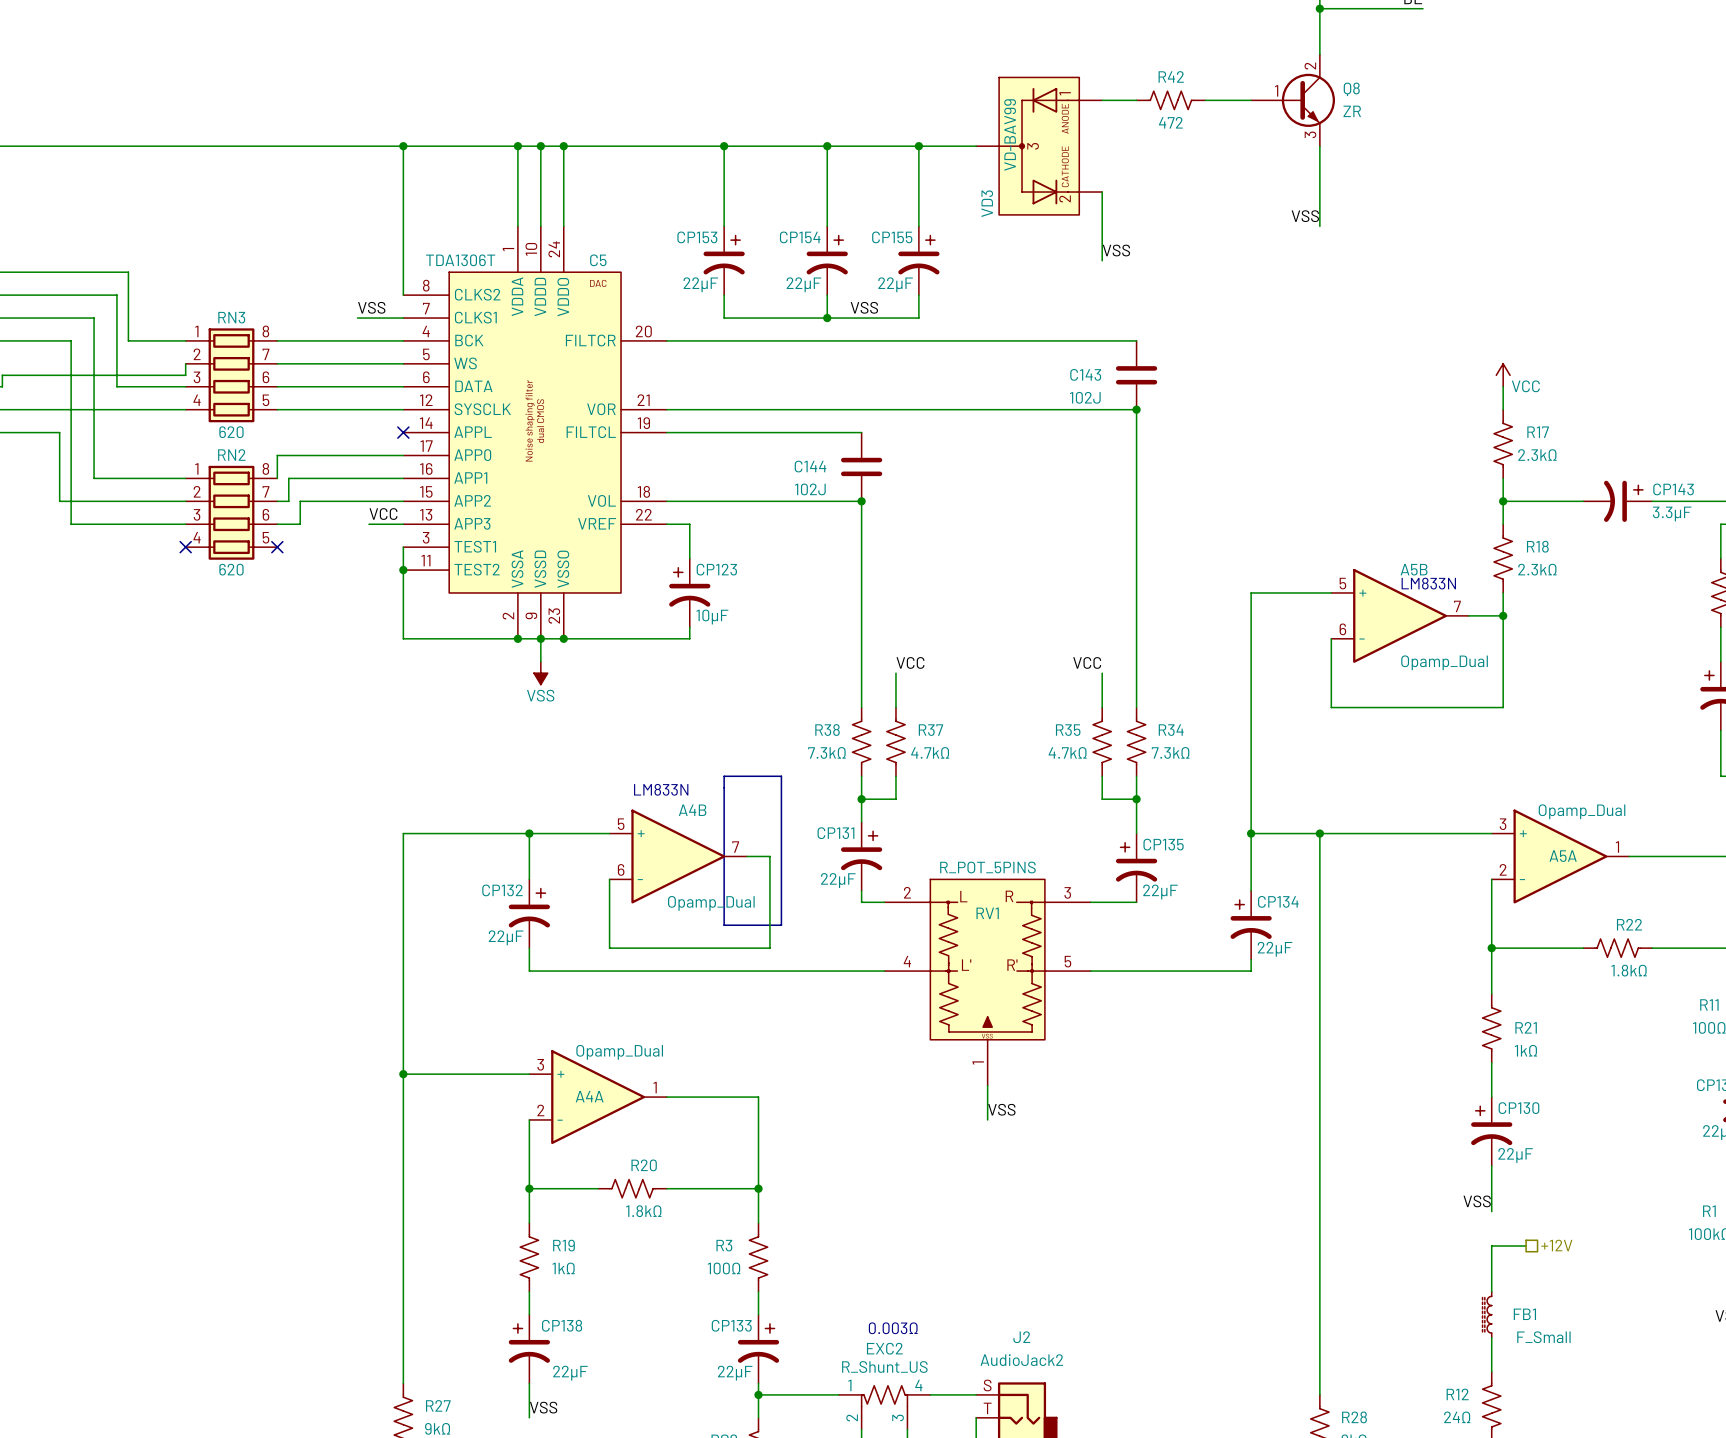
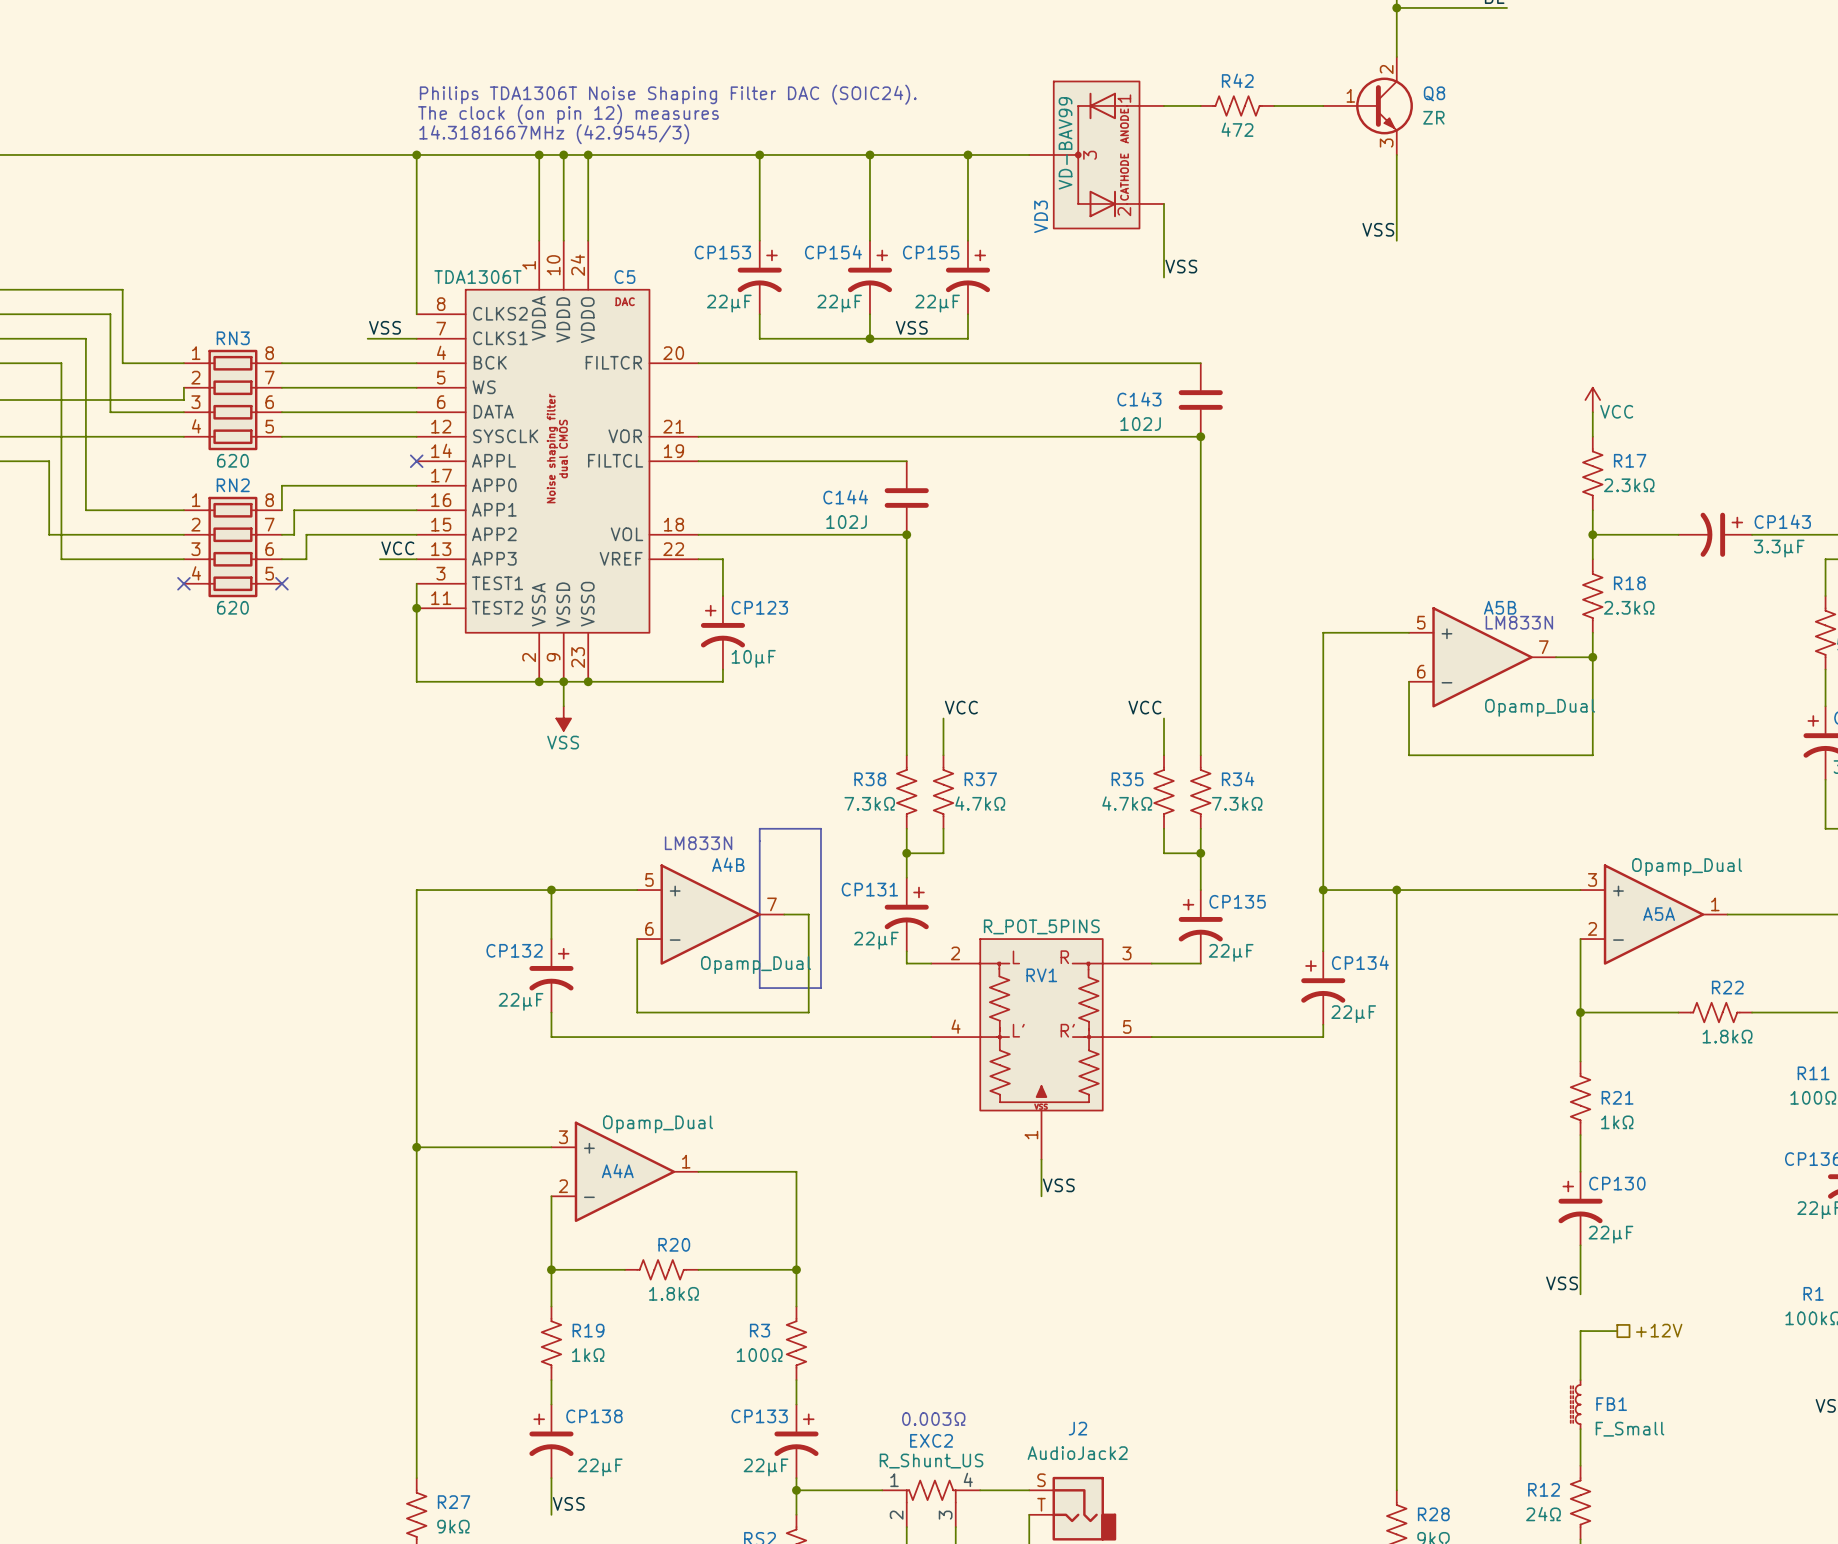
text: none -> Philips TDA1306T Noise Shaping Filter DAC (SOIC24). (668, 94)
text: none -> The clock (on pin 12) measures (568, 114)
text: none -> 14.3181667MHz (42.9545/3) (554, 134)

